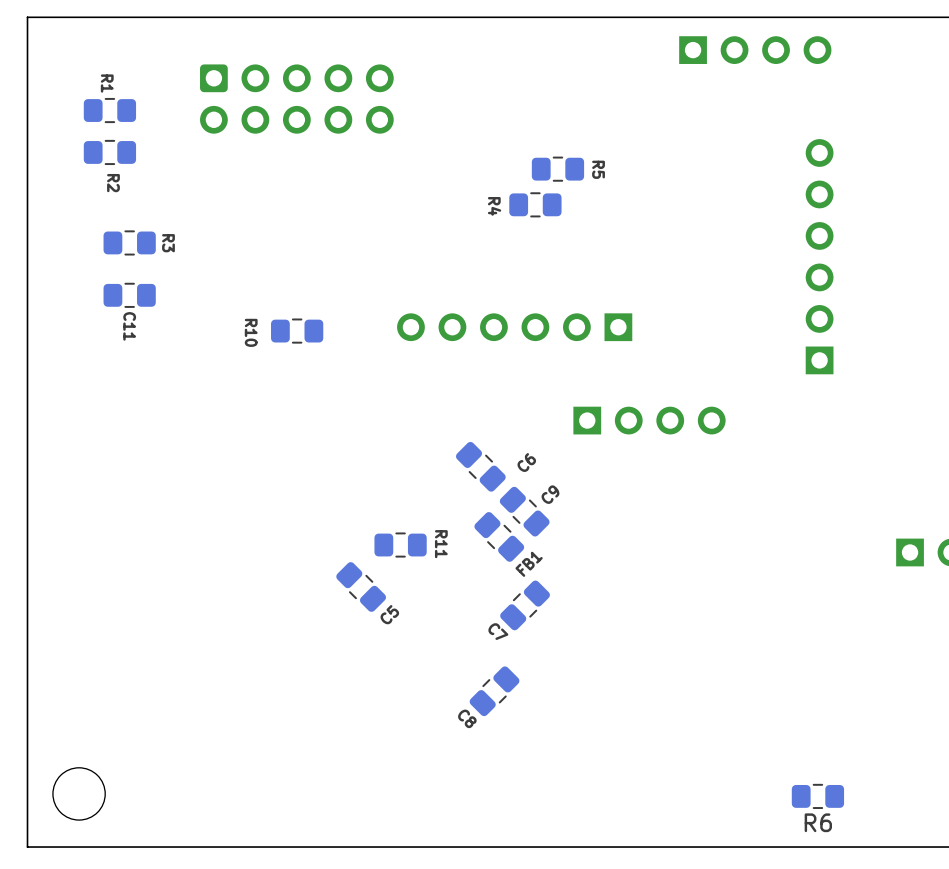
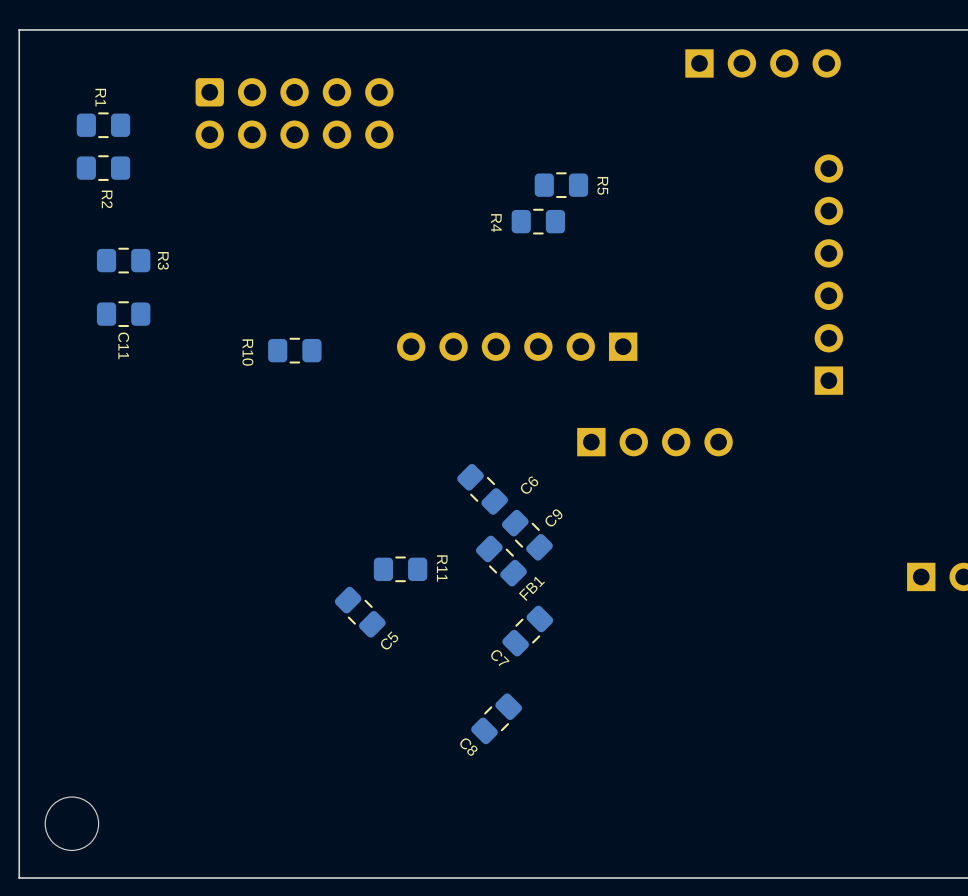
R6: (817, 796) -> none

